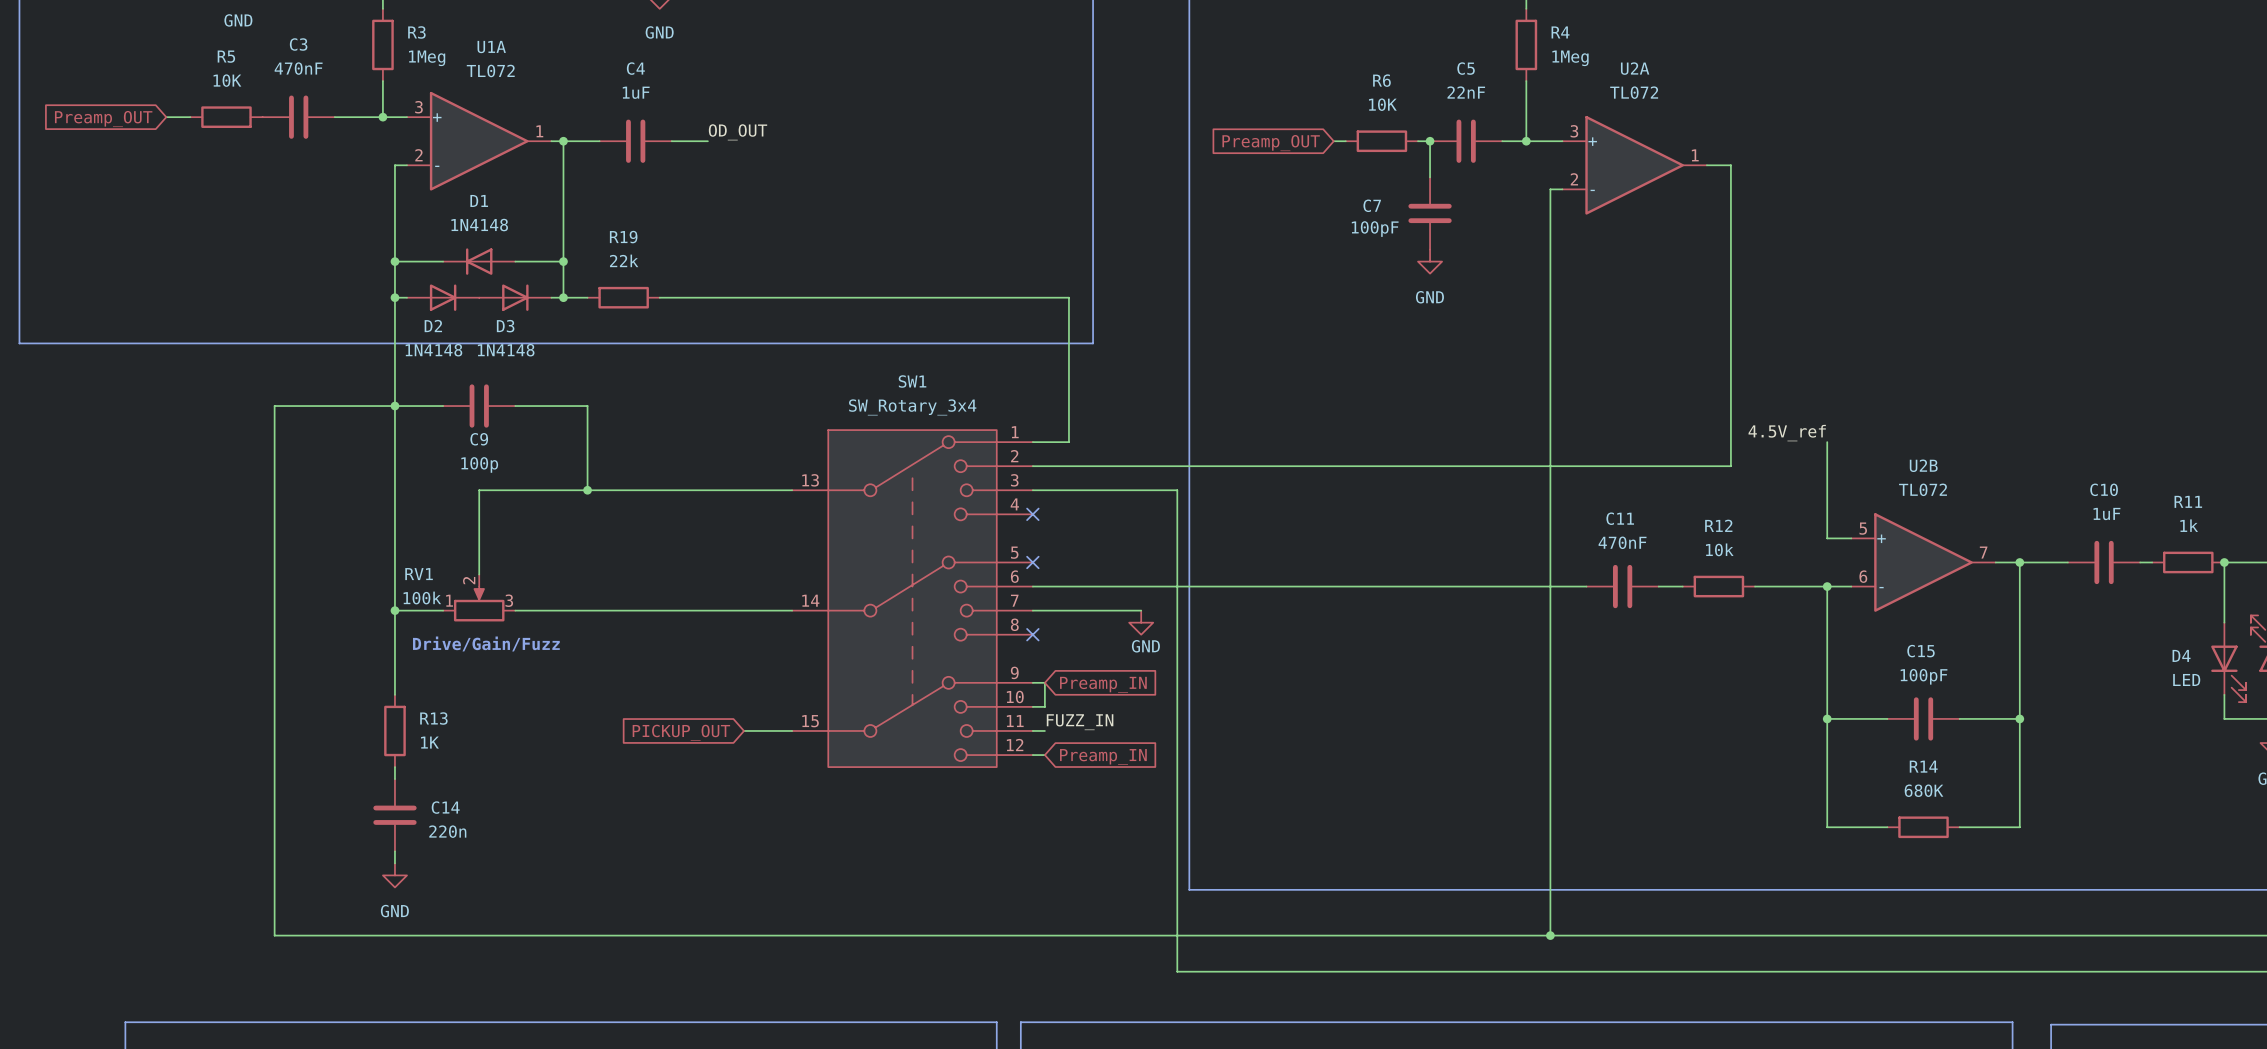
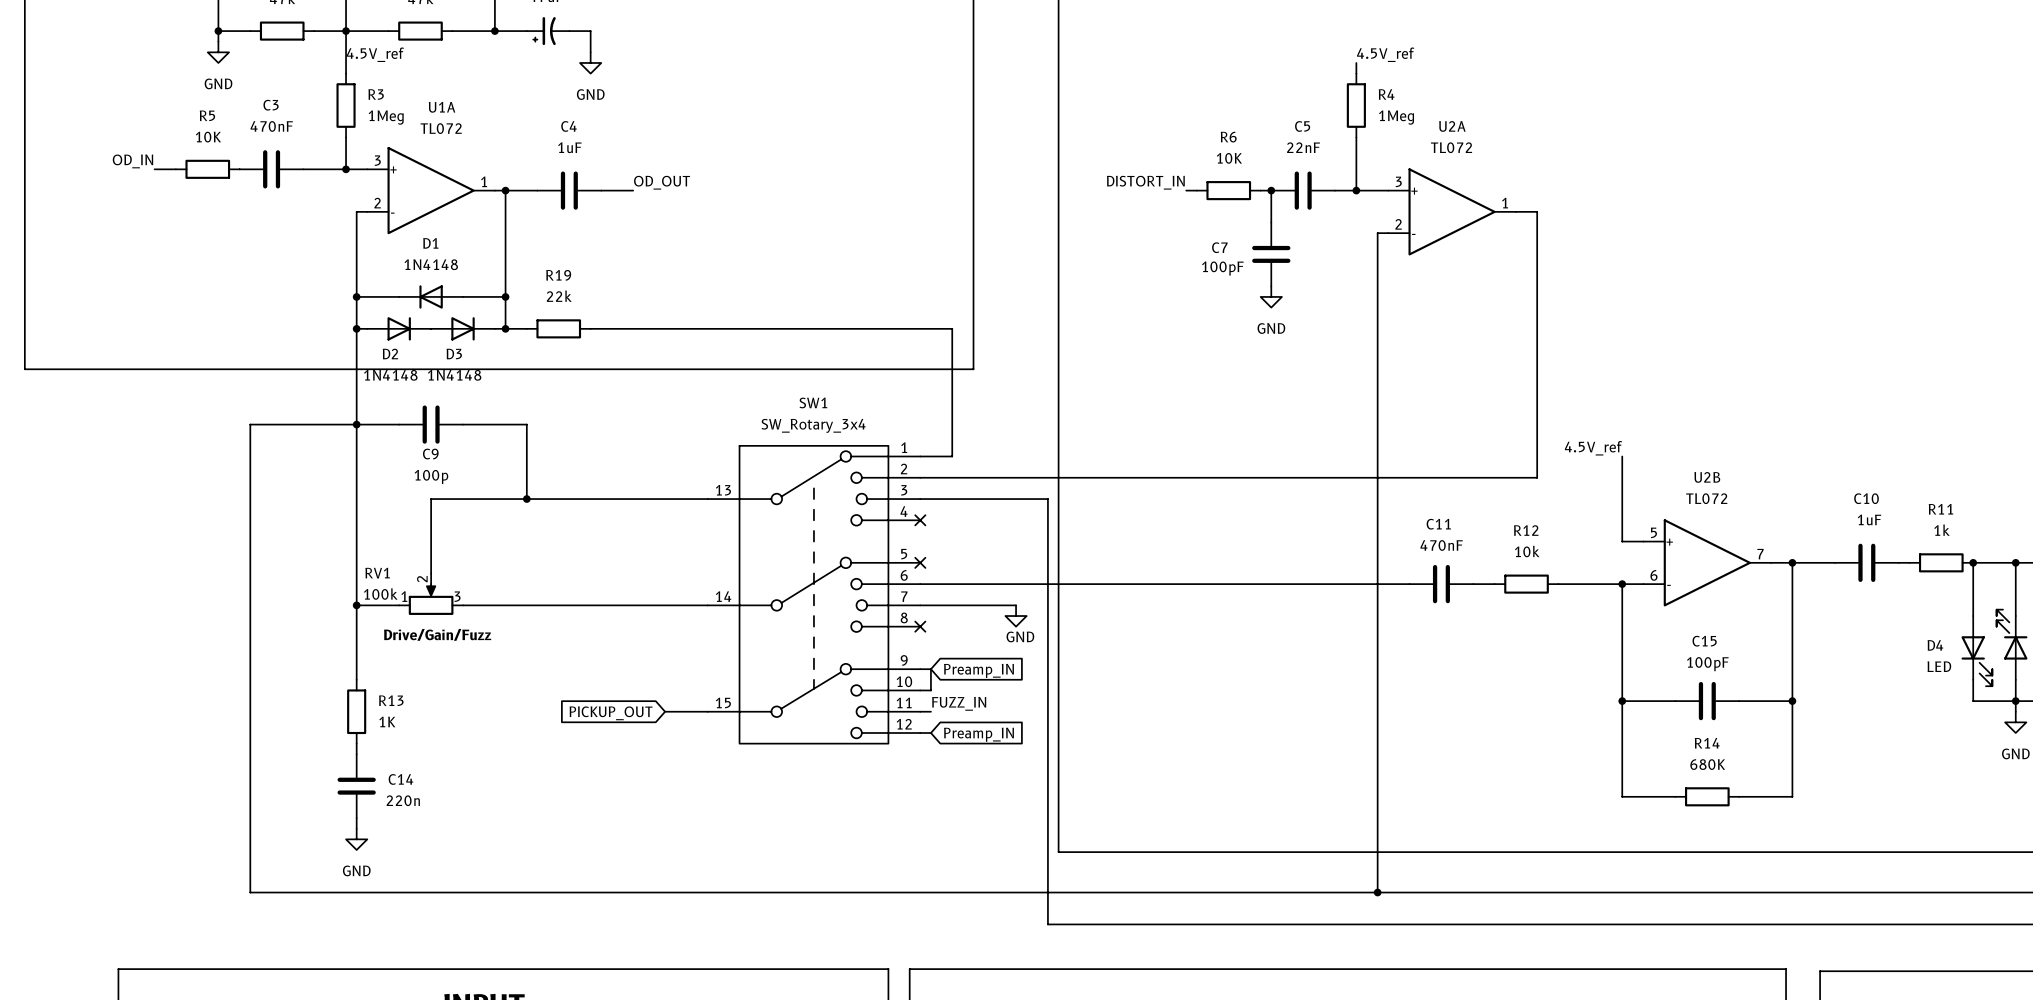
label: none -> OD_IN (132, 161)
global label: Preamp_OUT (103, 119) -> none
label: none -> DISTORT_IN (1145, 182)
global label: Preamp_OUT (1271, 143) -> none

